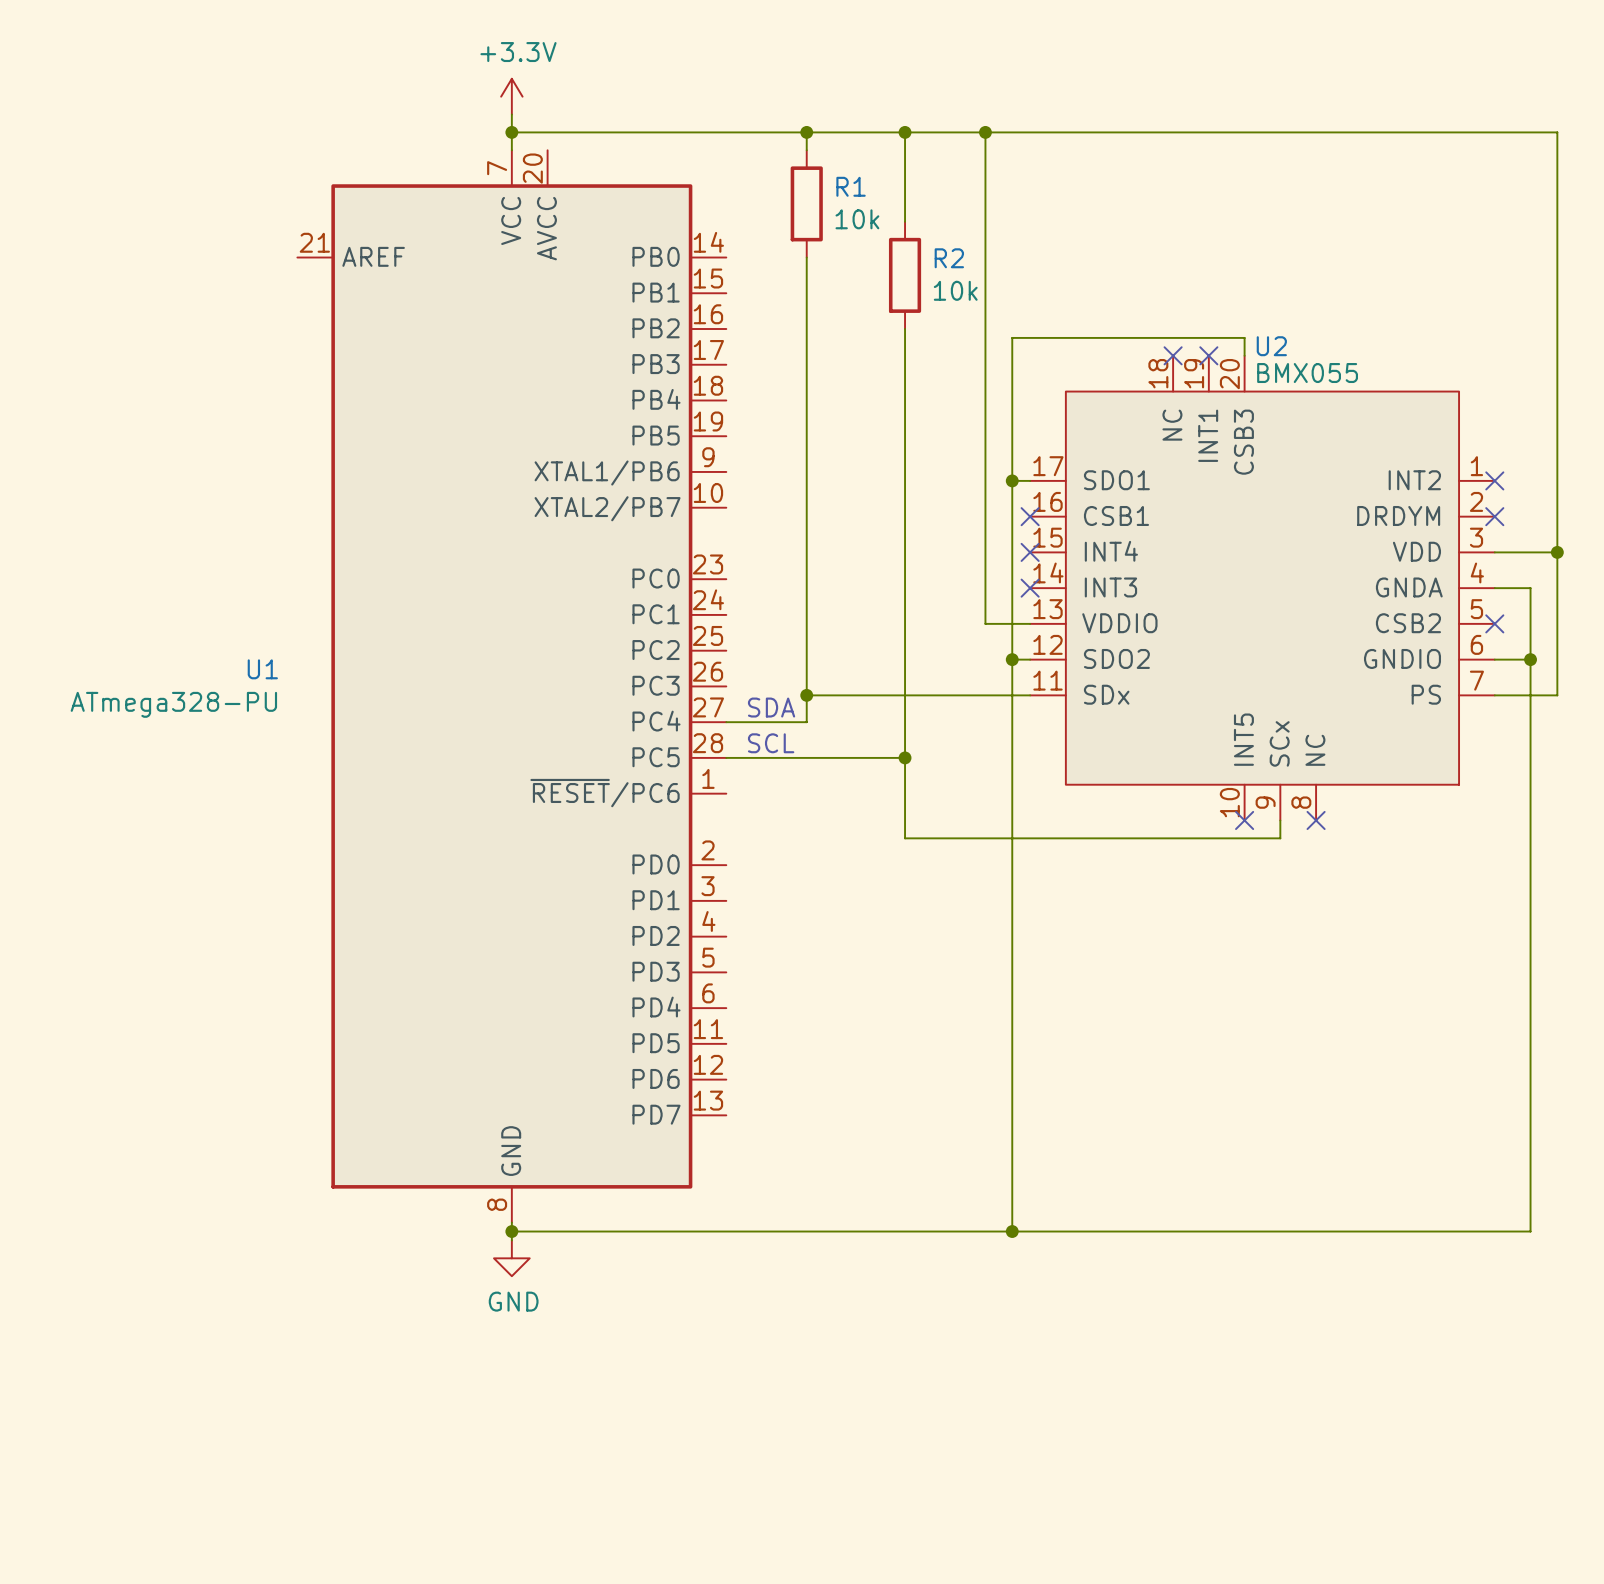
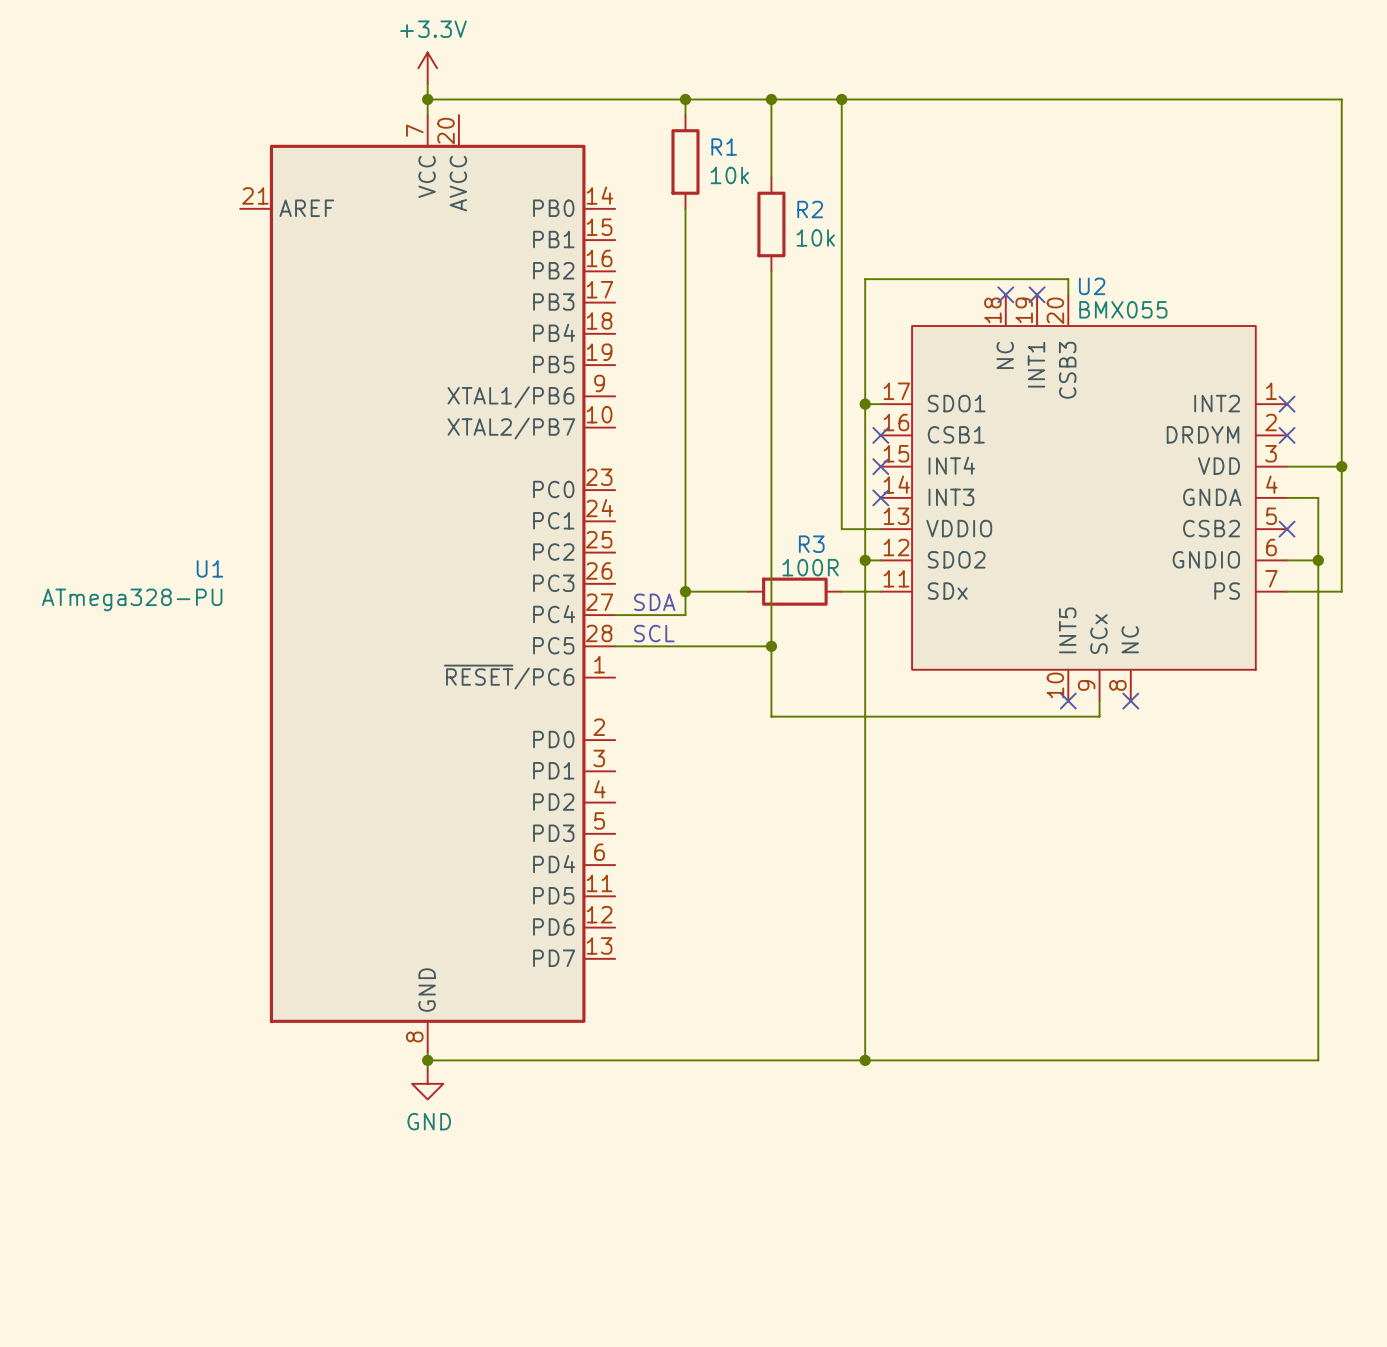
wire: (878, 695) (985, 695) -> none
R3: none -> 100R (794, 591)

